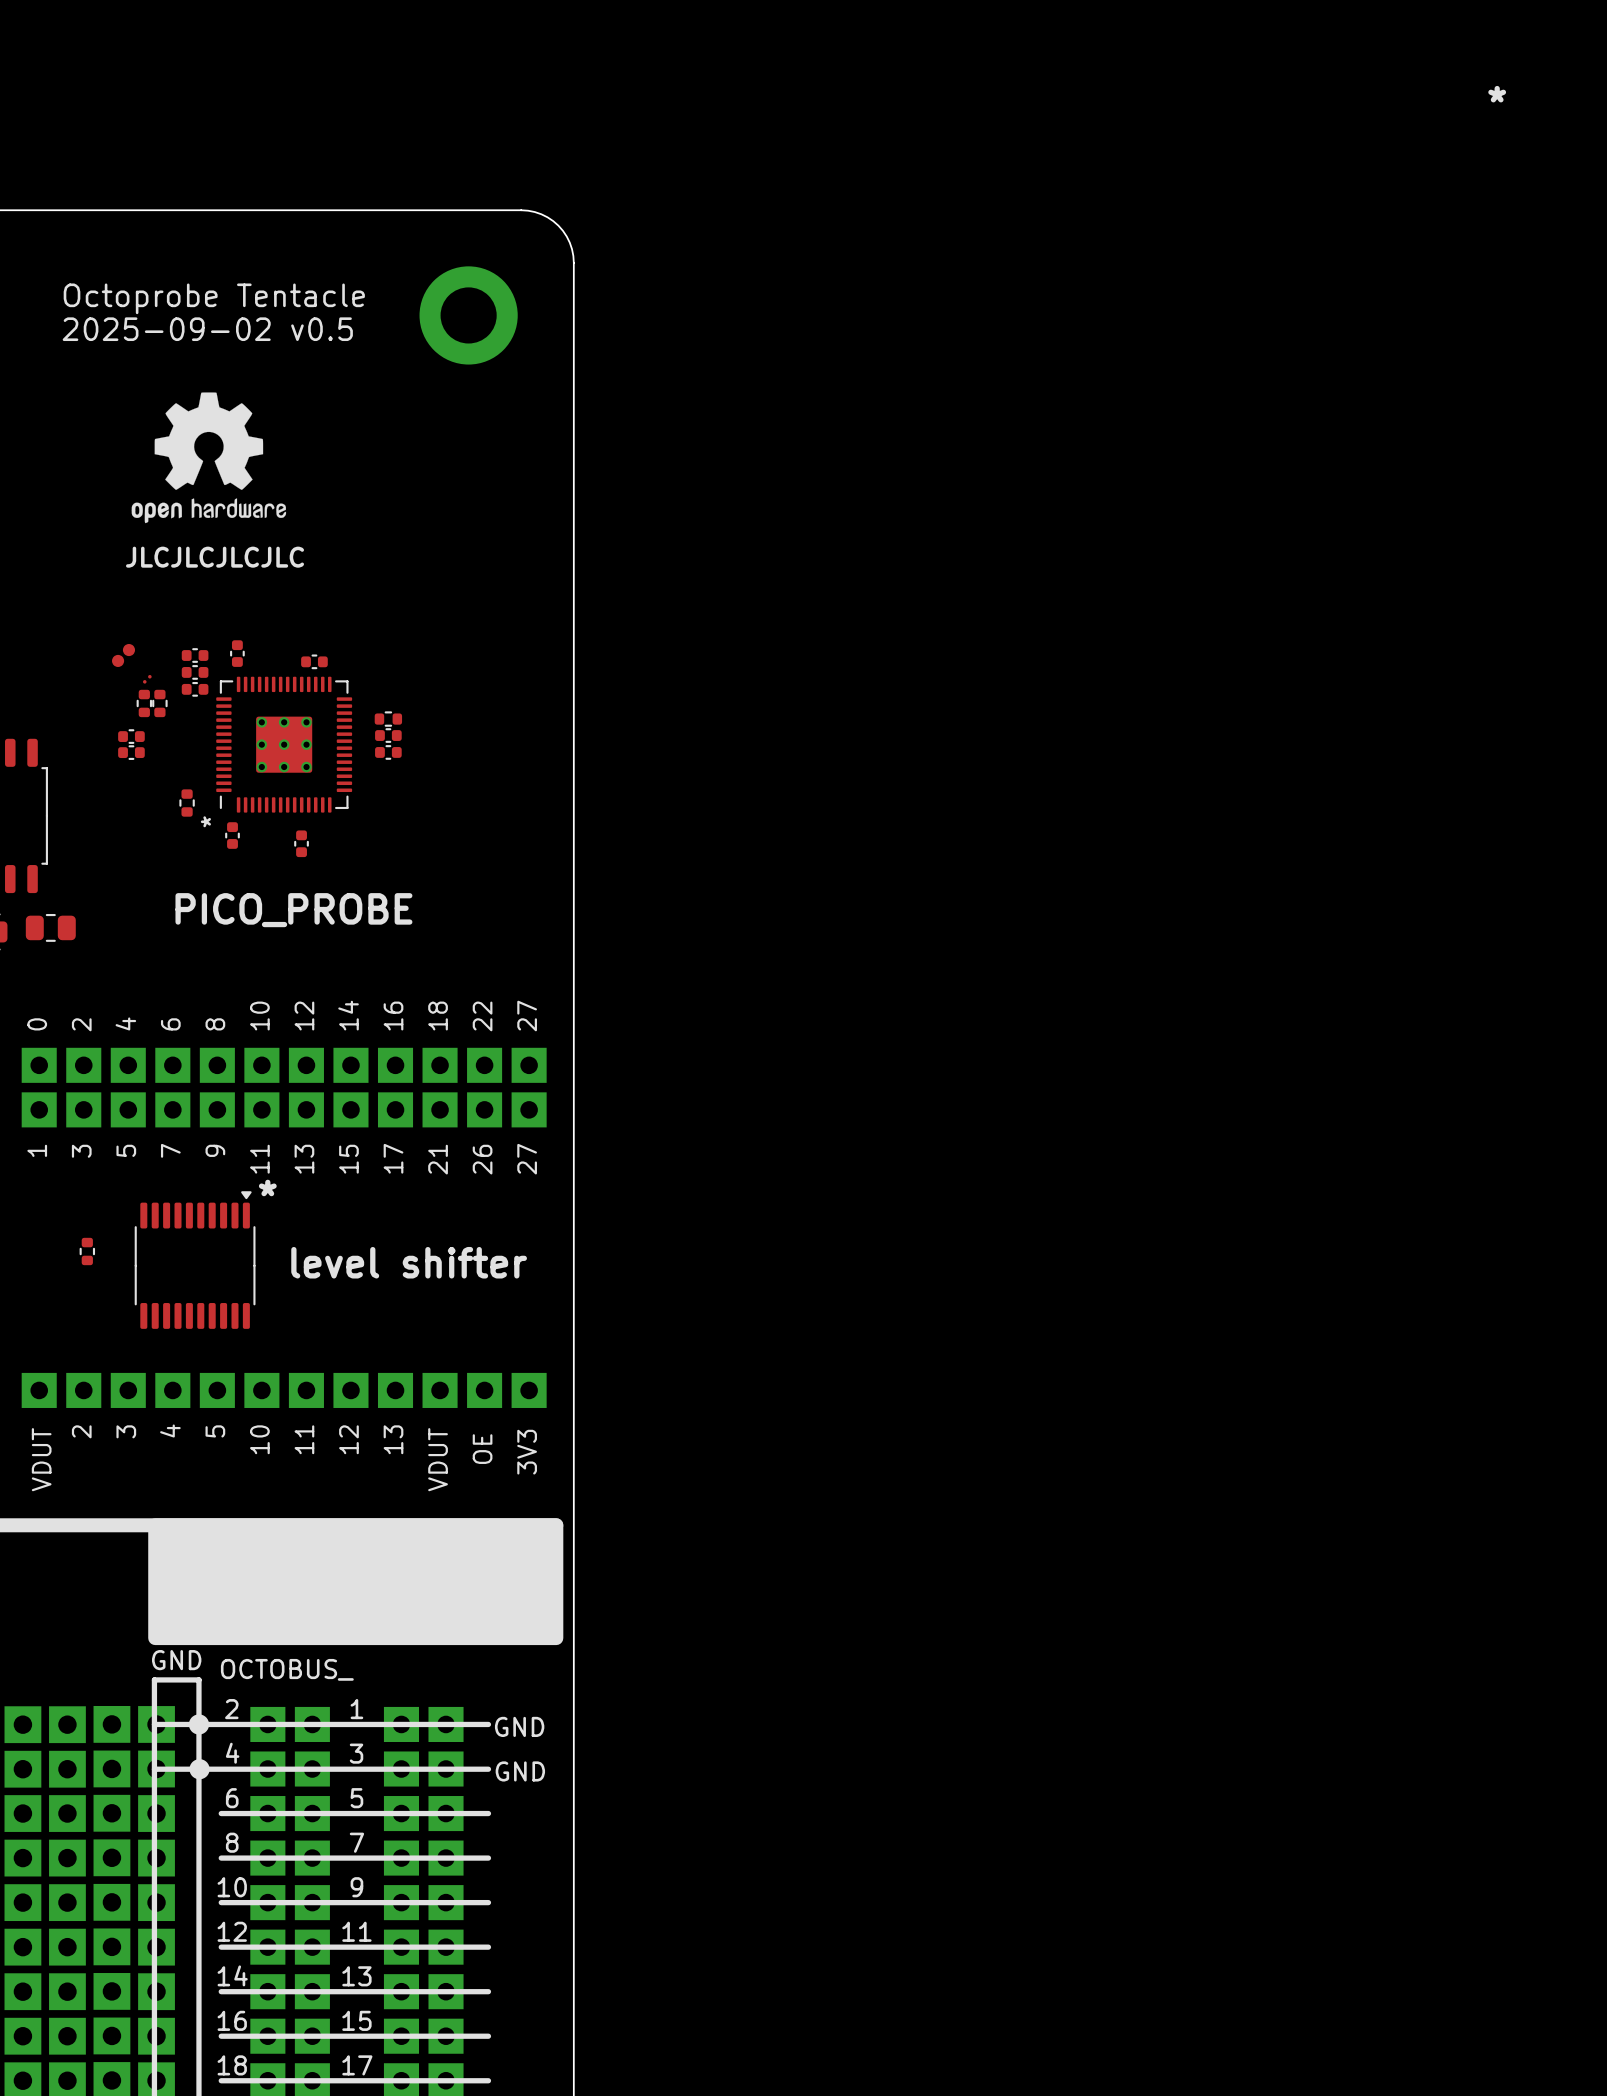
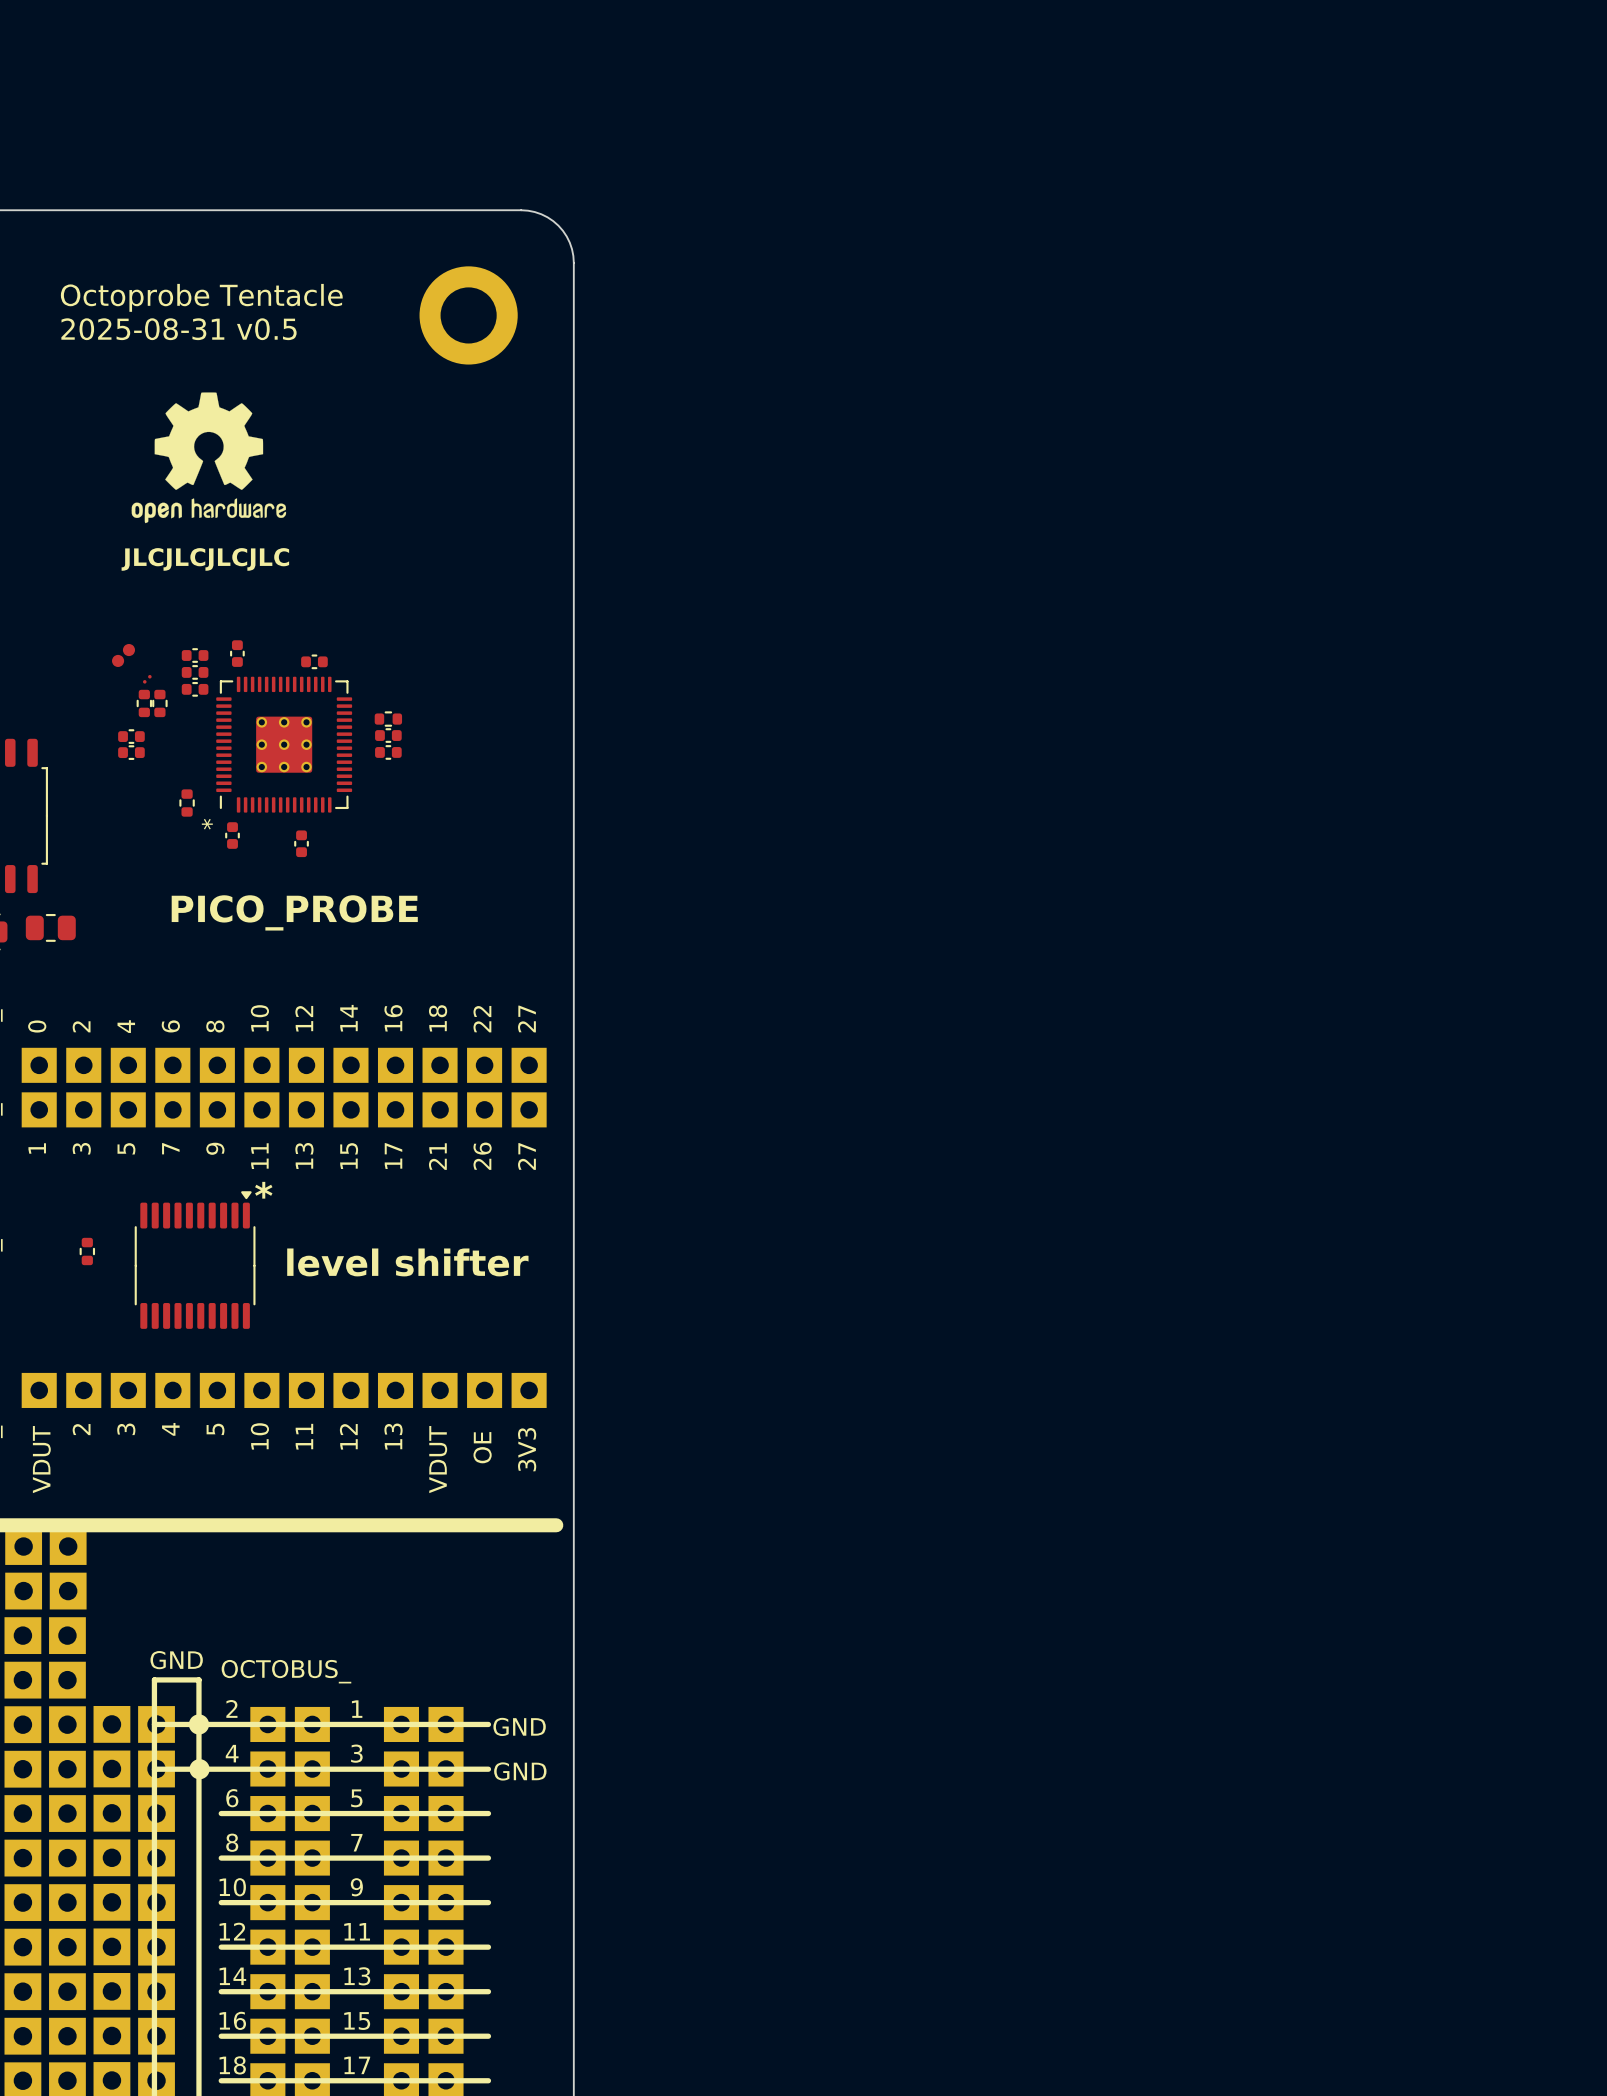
text: * (1497, 94) -> none
text: 2025-09-02 v0.5 (207, 329) -> 2025-08-31 v0.5 (178, 329)
drawing: [148, 1518, 564, 1646] -> none
part: none -> (23, 1546)
part: none -> (68, 1546)
part: none -> (23, 1591)
part: none -> (68, 1591)
part: none -> (22, 1635)
part: none -> (67, 1635)
part: none -> (22, 1680)
part: none -> (67, 1680)

